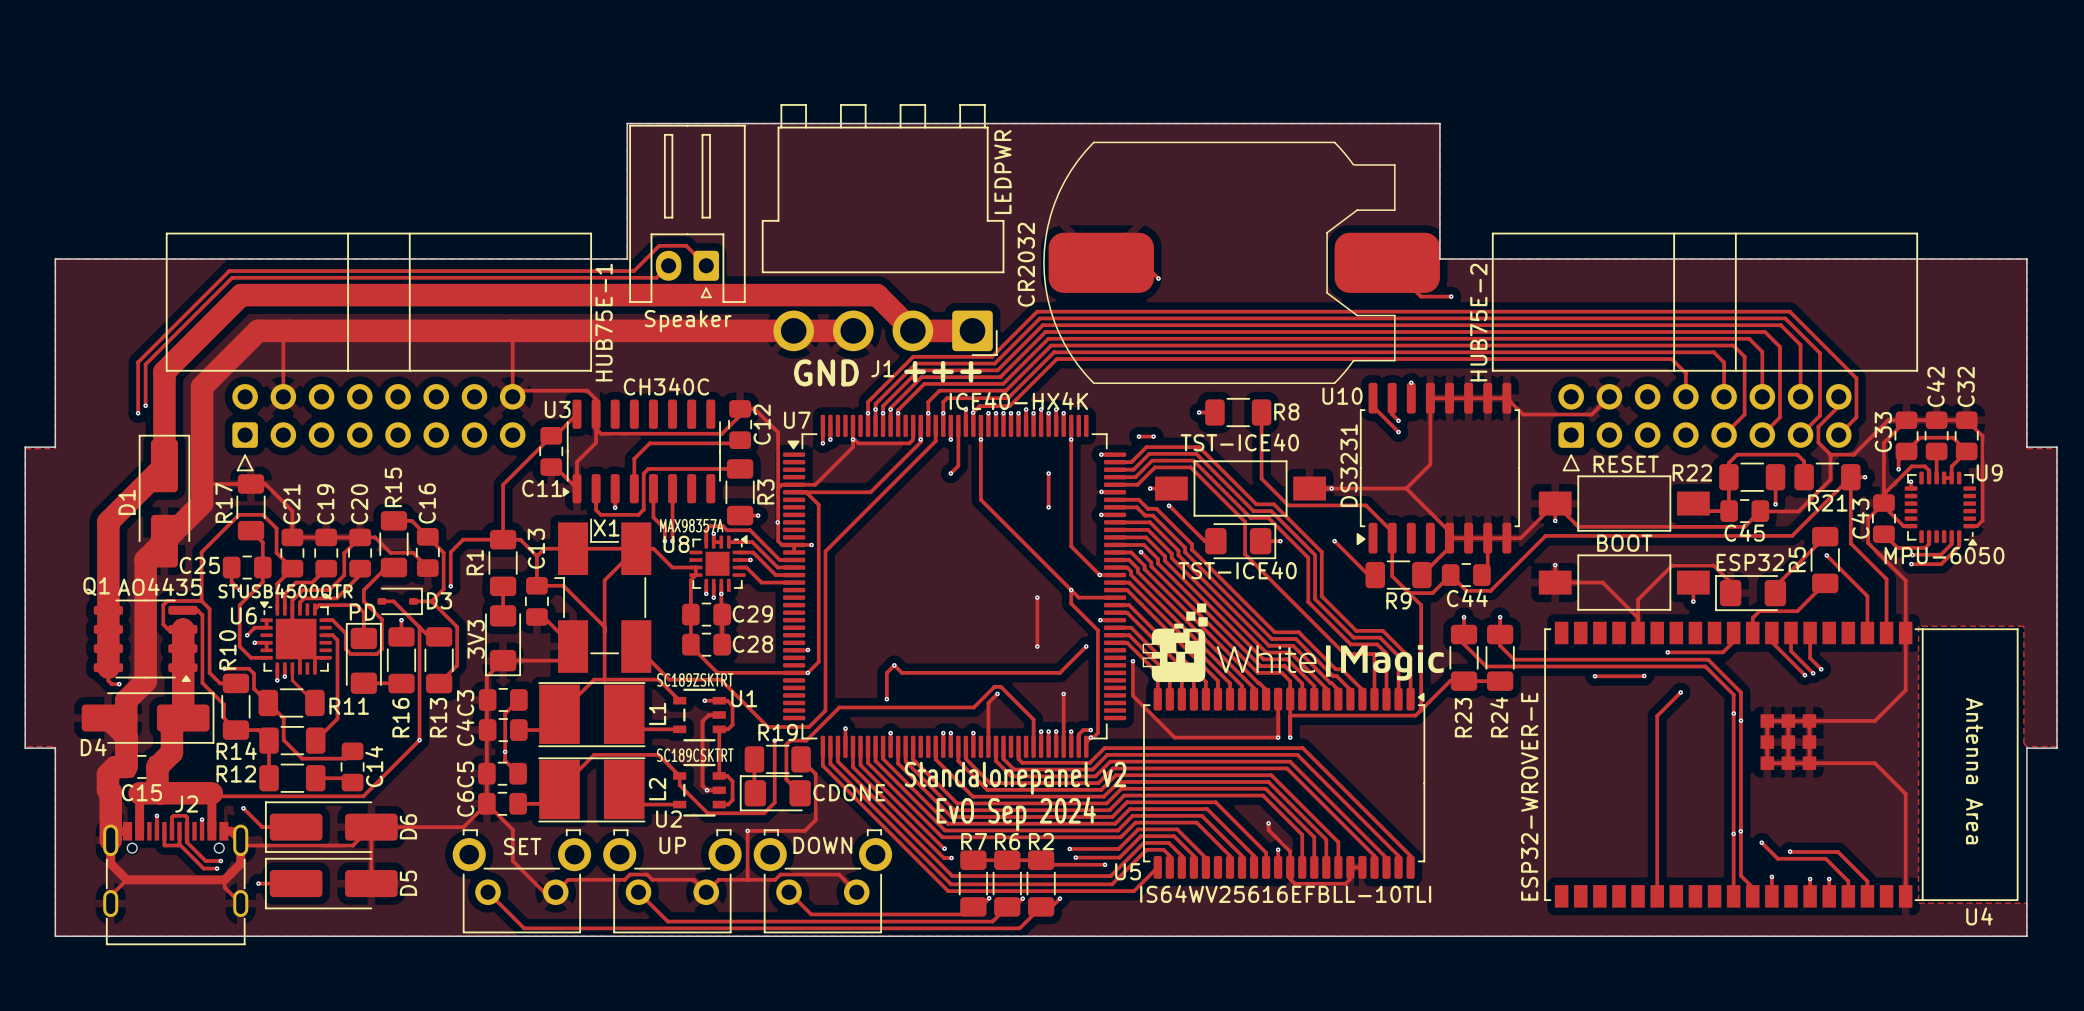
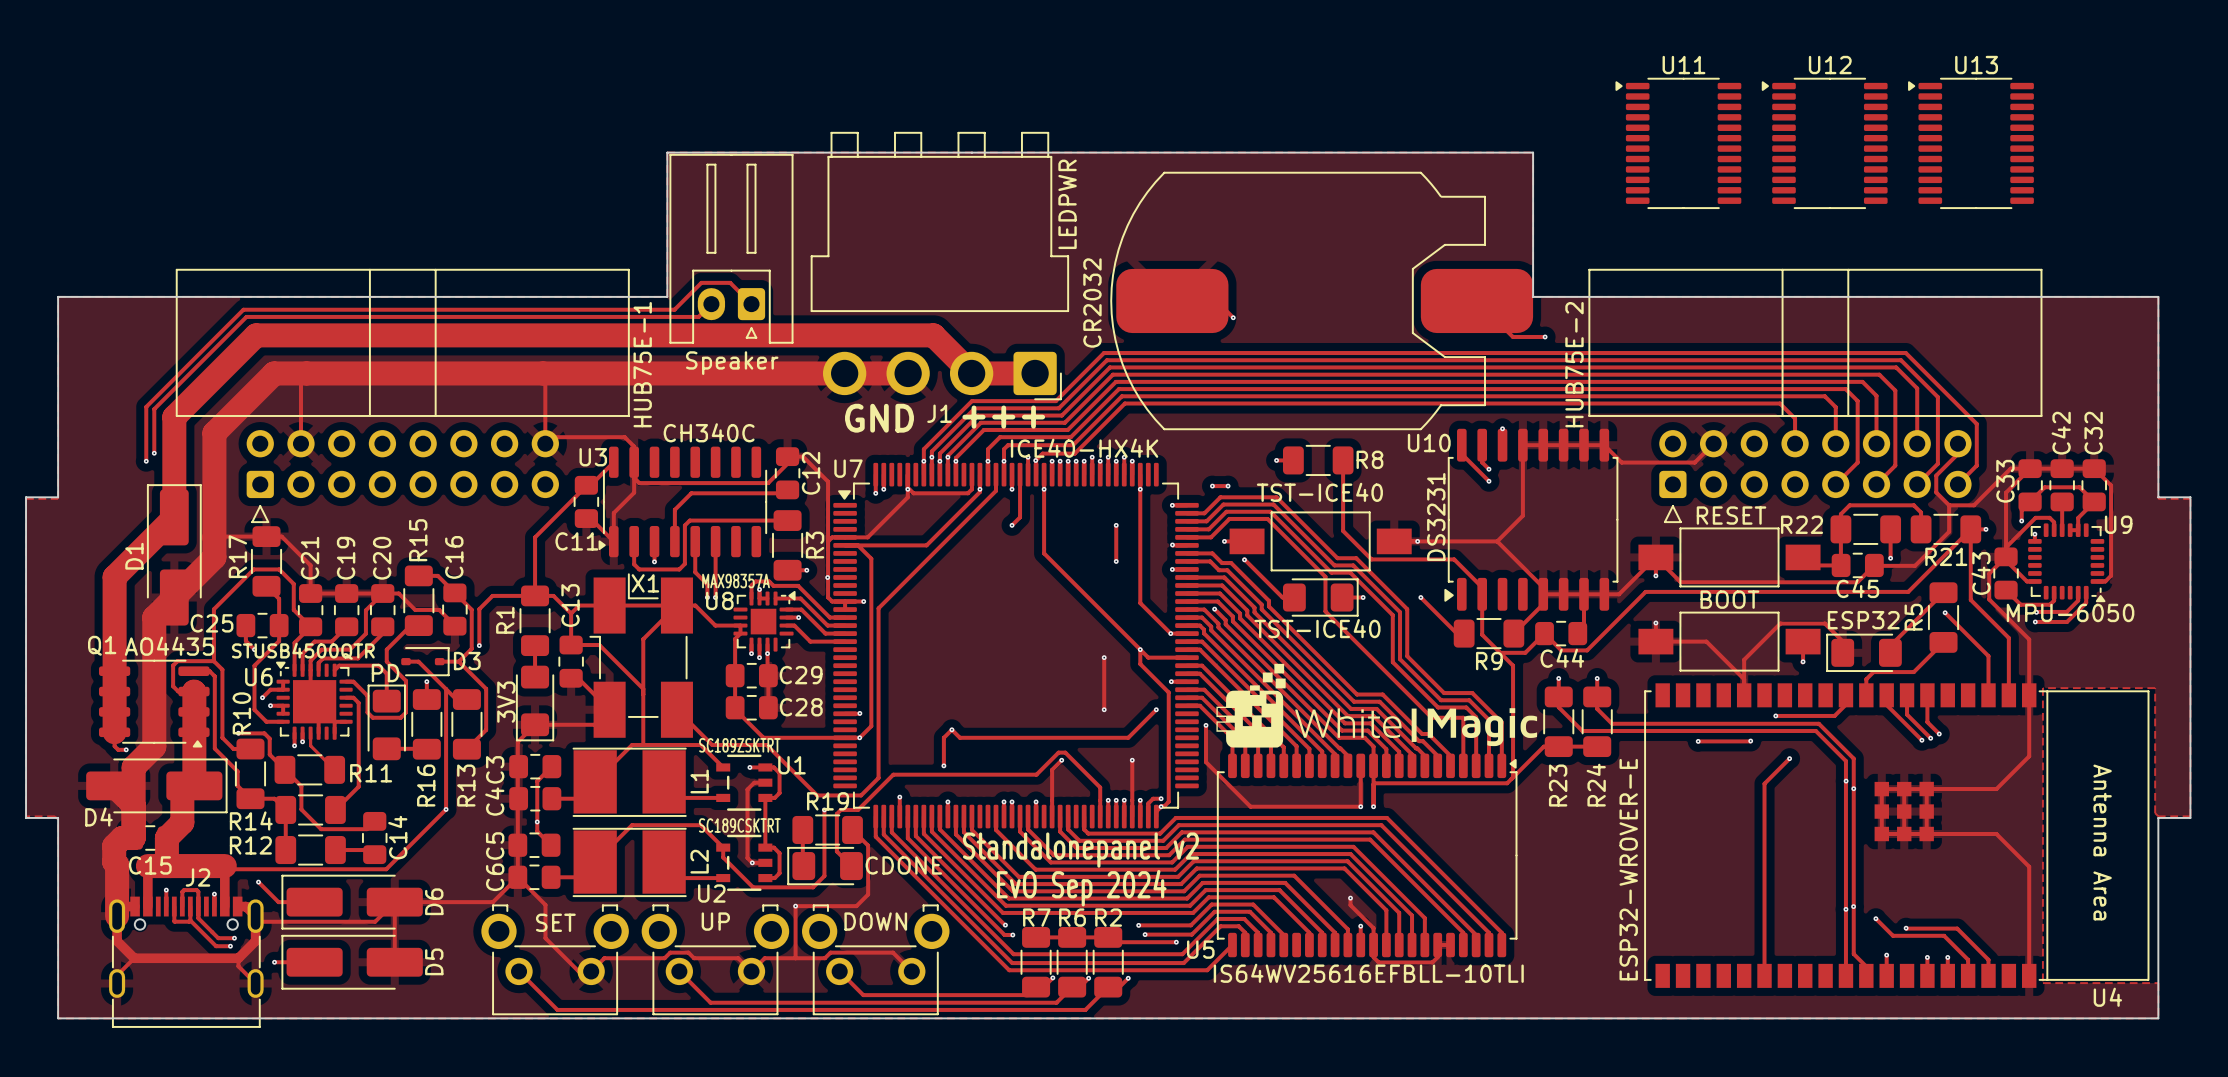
U11: none -> (1678, 143)
U12: none -> (1824, 143)
U13: none -> (1970, 143)

